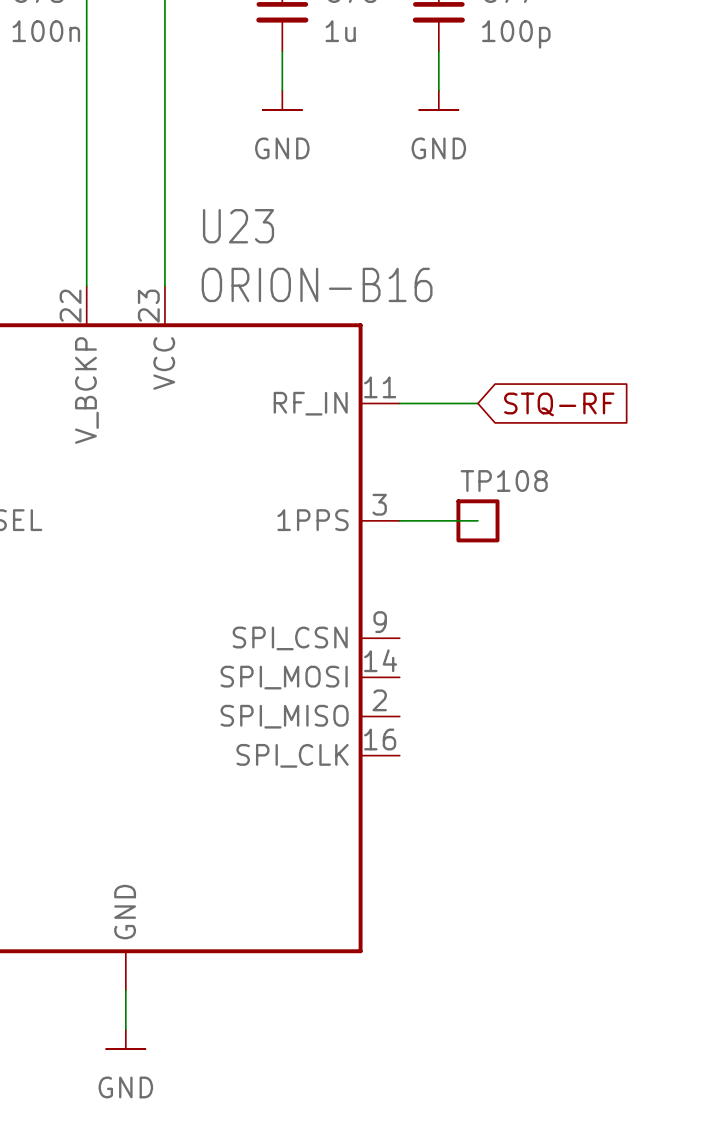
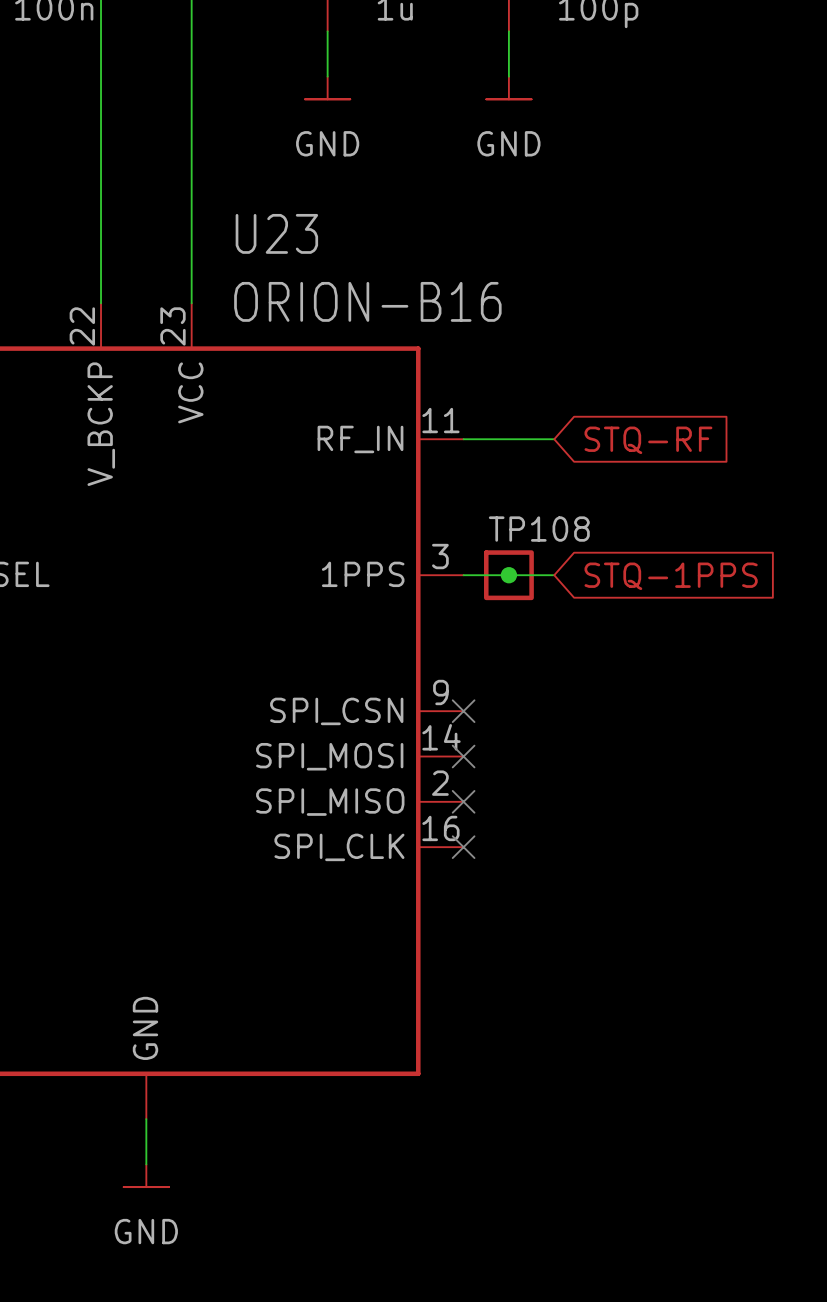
junction: none -> (508, 575)
TP108 position: (477, 520) -> (508, 575)
global label: none -> STQ-1PPS (671, 576)
no-connect mark: none -> (463, 711)
no-connect mark: none -> (463, 756)
no-connect mark: none -> (463, 801)
no-connect mark: none -> (463, 847)

